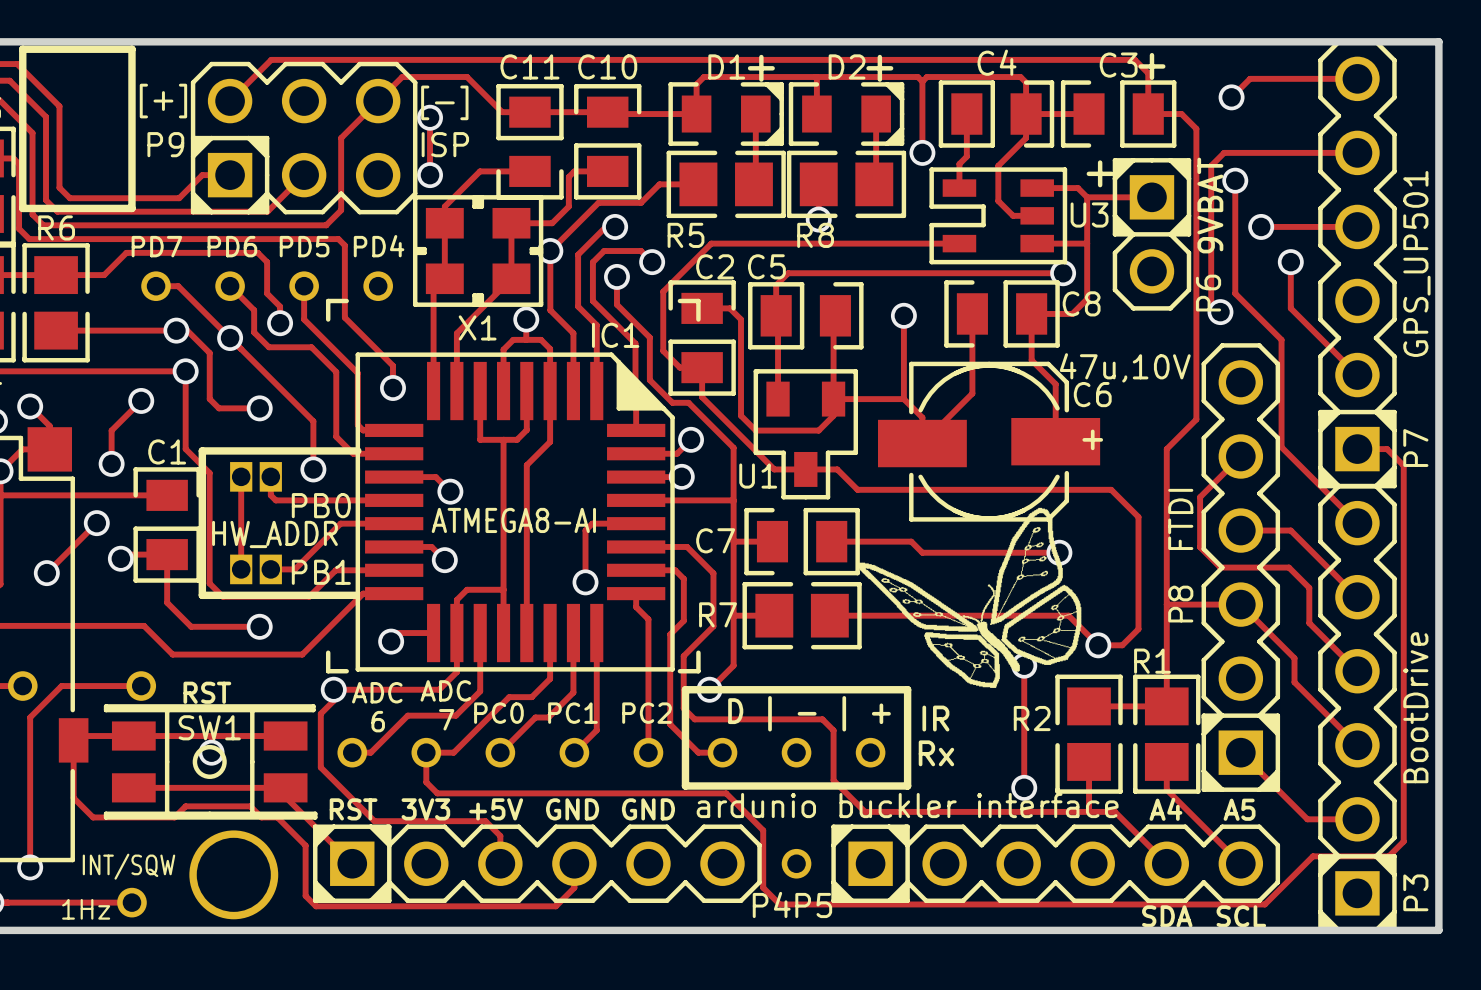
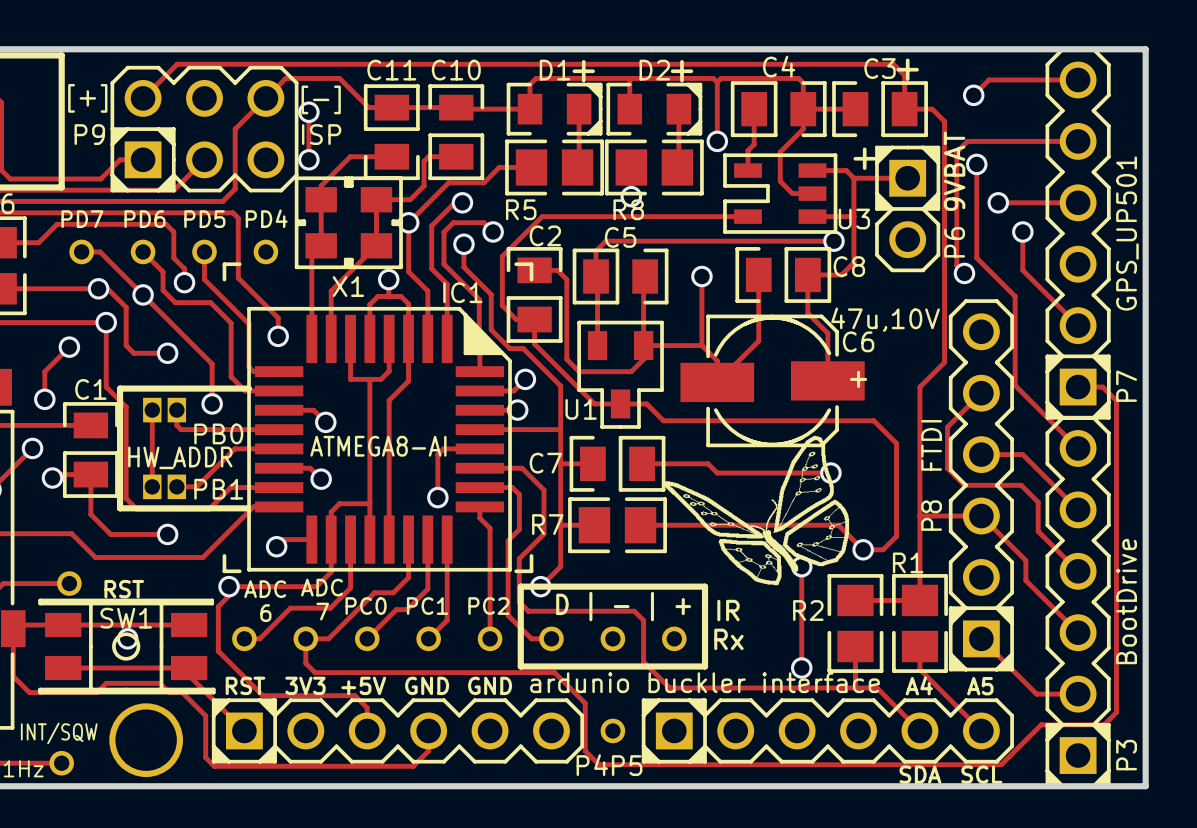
text position: 9VBAT (1210, 205) -> 9VBAT (954, 171)
U3 name position: U3 (1089, 215) -> U3 (854, 219)
C5 name position: C5 (766, 266) -> C5 (620, 237)
P6 name position: P6 (1208, 293) -> P6 (954, 242)

